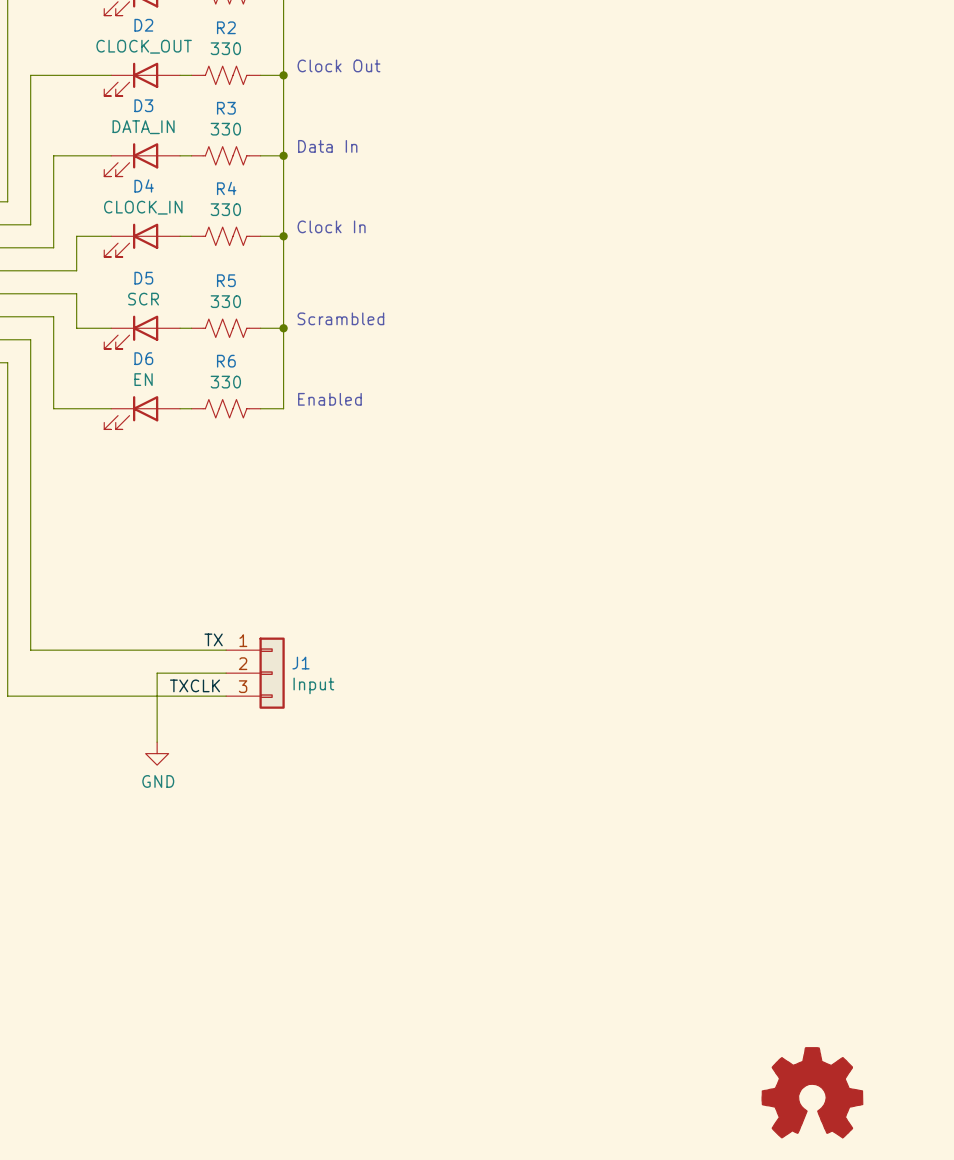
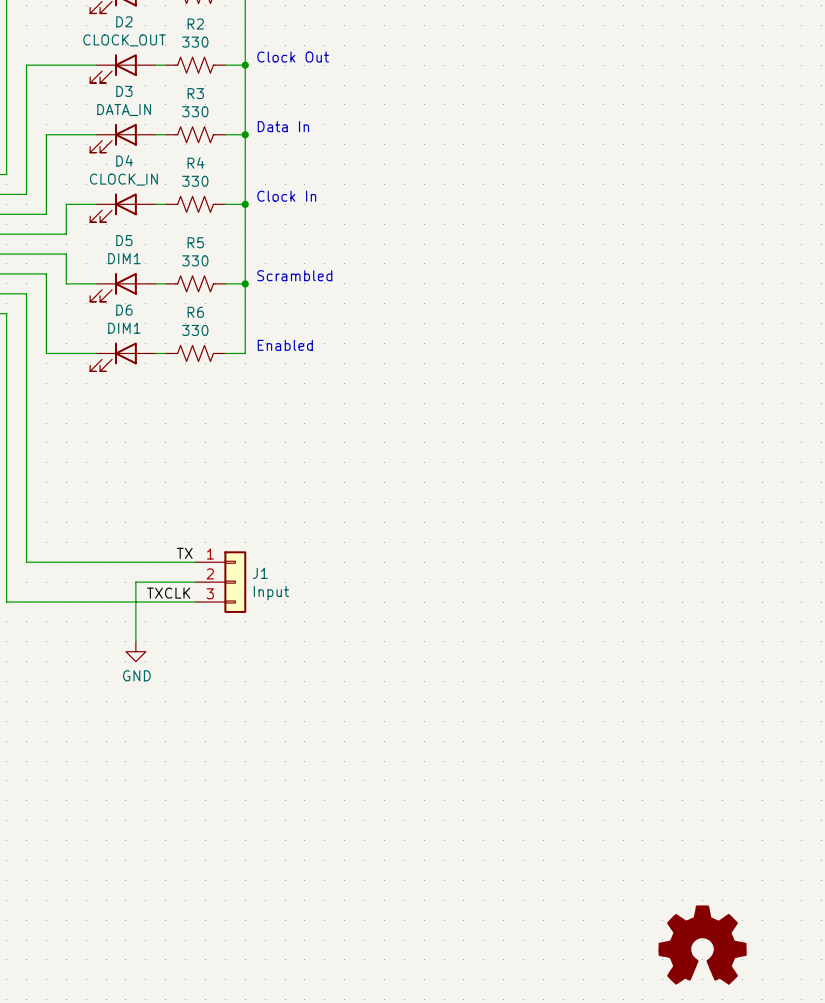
D5 value: SCR (143, 299) -> DIM1 (124, 258)
D6 value: EN (143, 379) -> DIM1 (124, 328)

